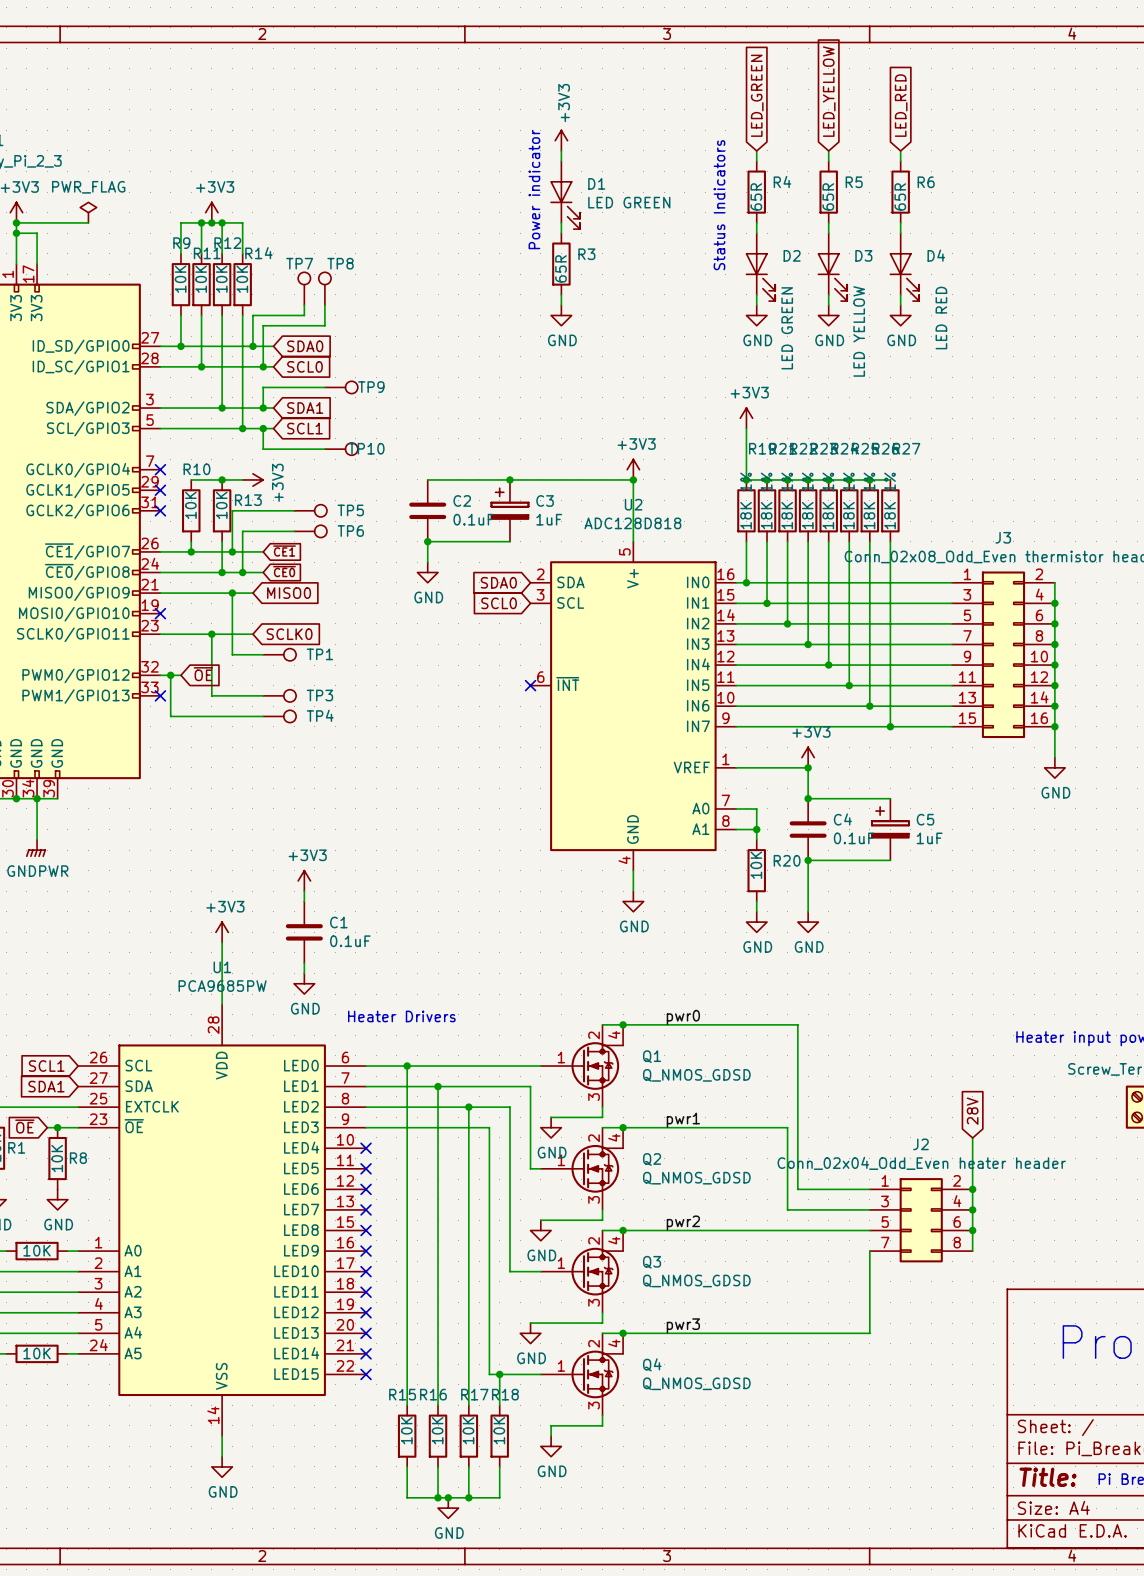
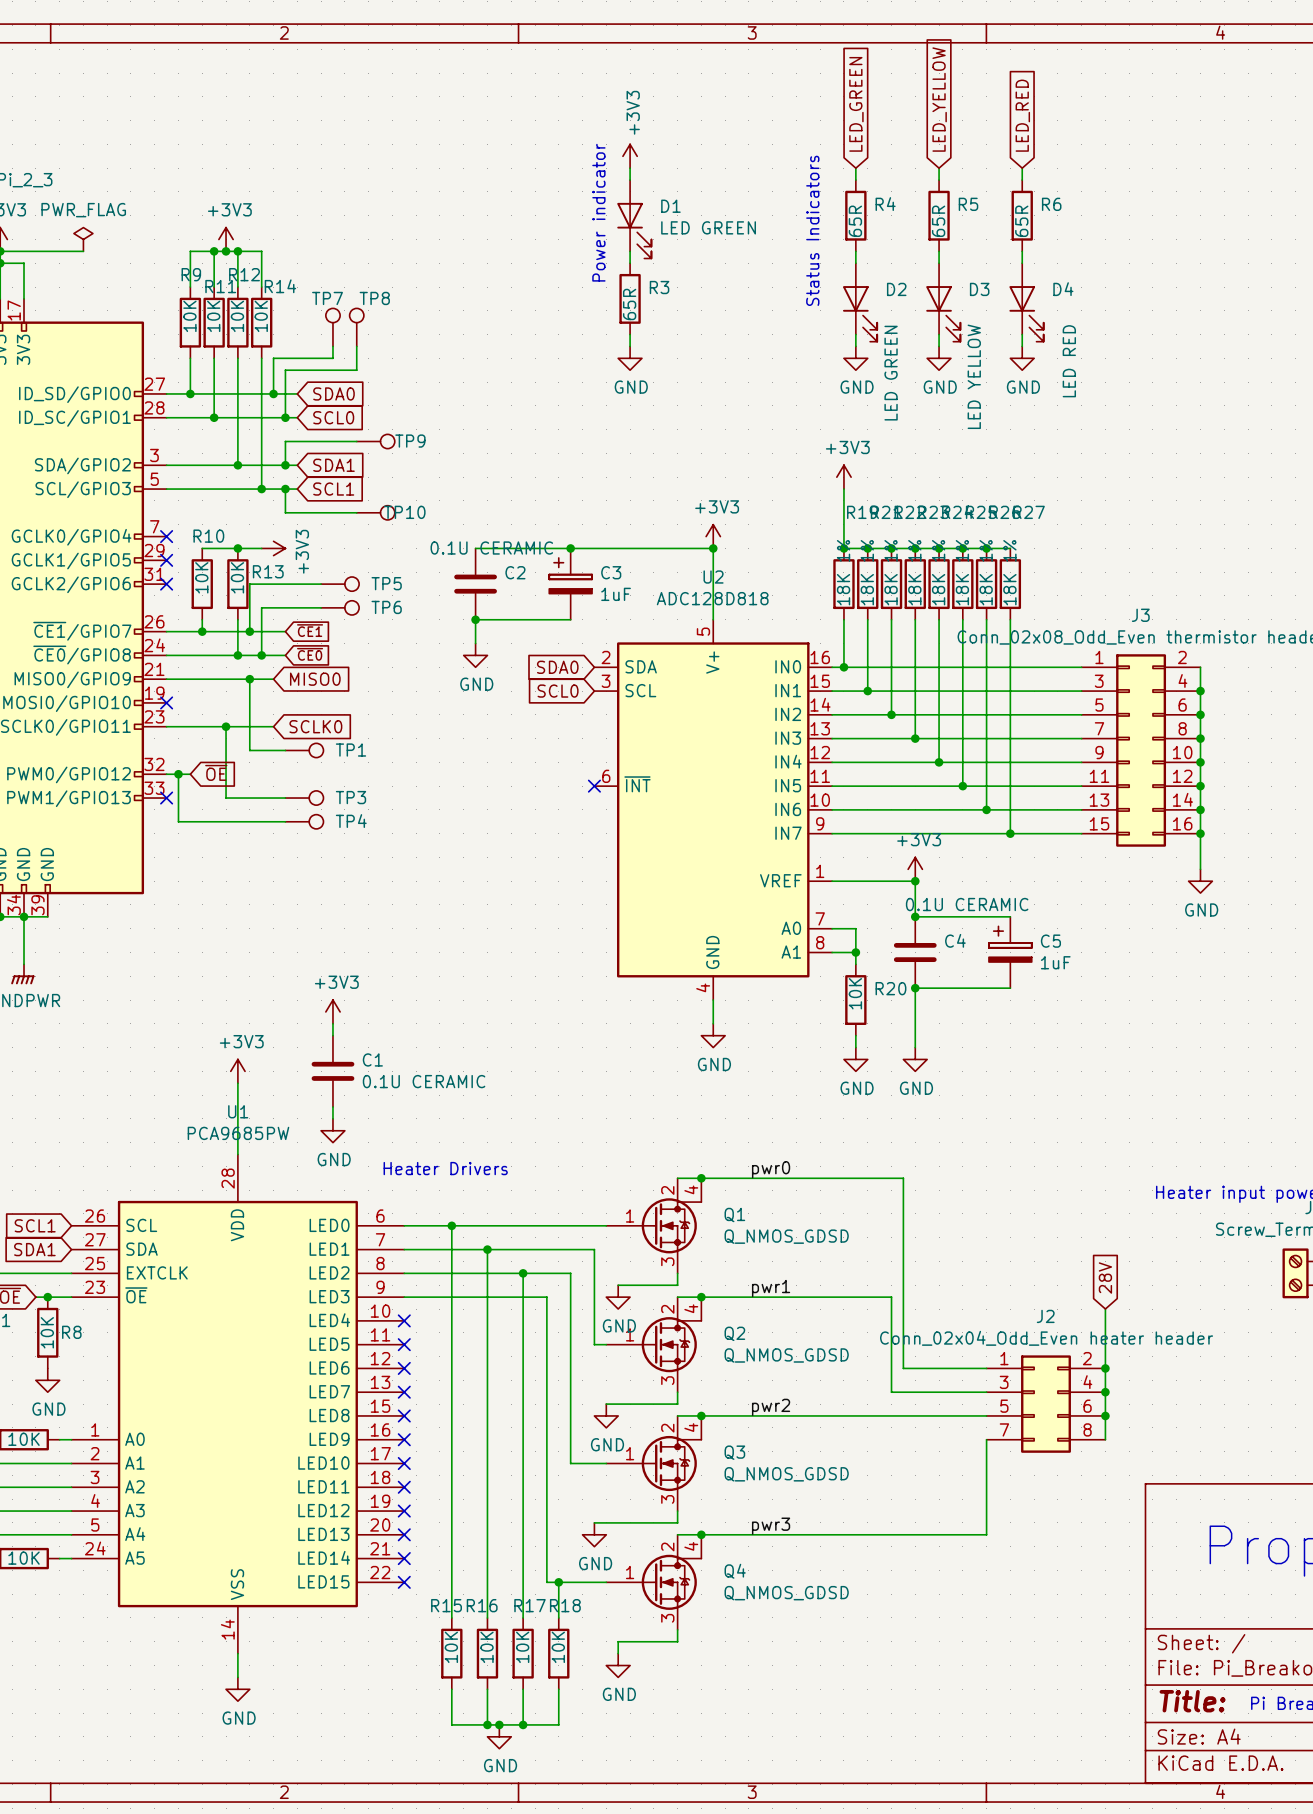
C2 value: 0.1uF (473, 519) -> 0.1U CERAMIC (491, 548)
C4 value: 0.1uF (854, 838) -> 0.1U CERAMIC (967, 904)
C1 value: 0.1uF (350, 941) -> 0.1U CERAMIC (424, 1081)

